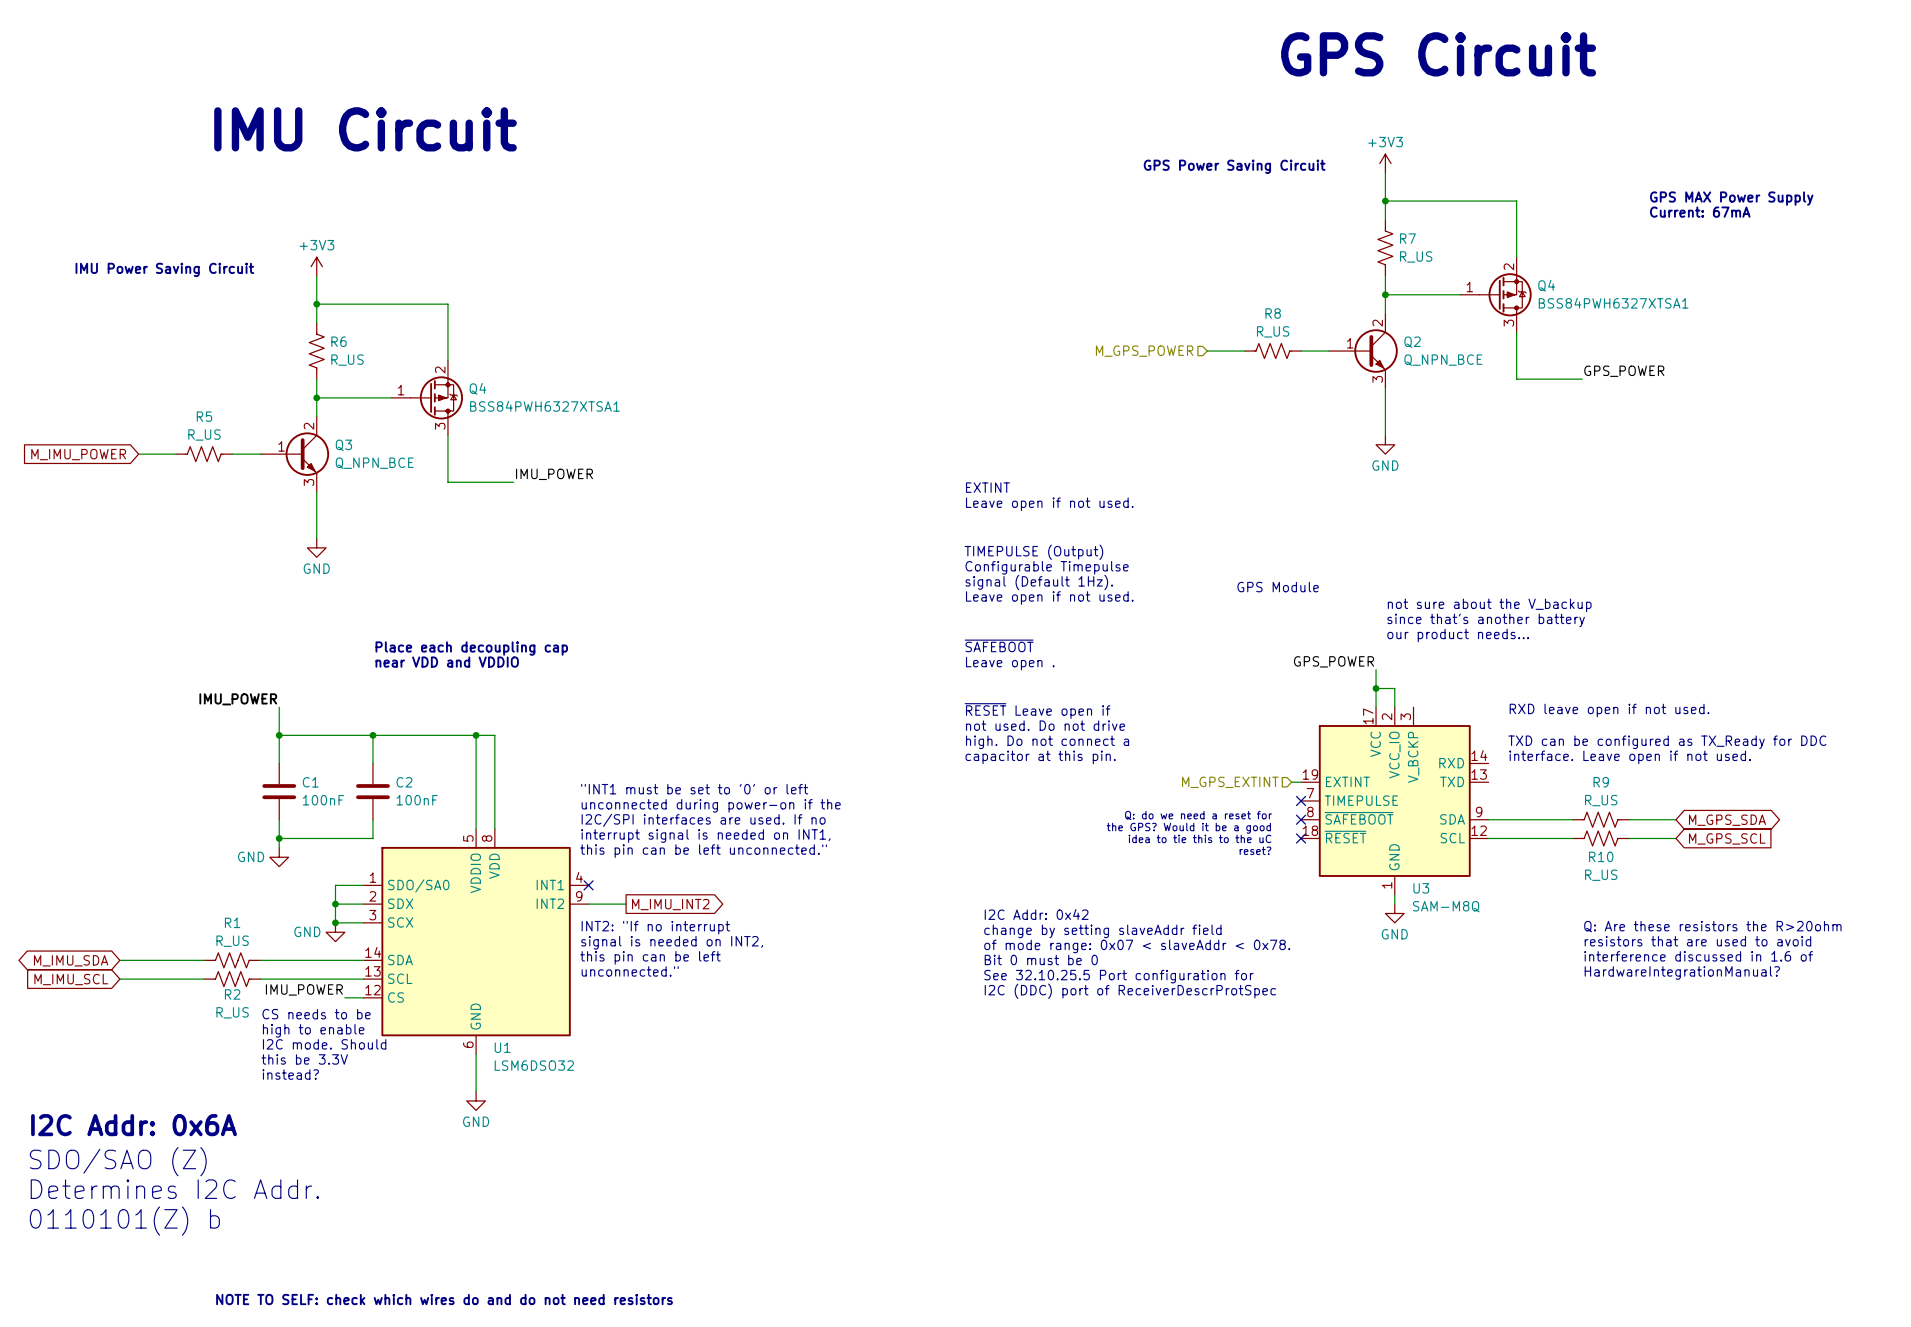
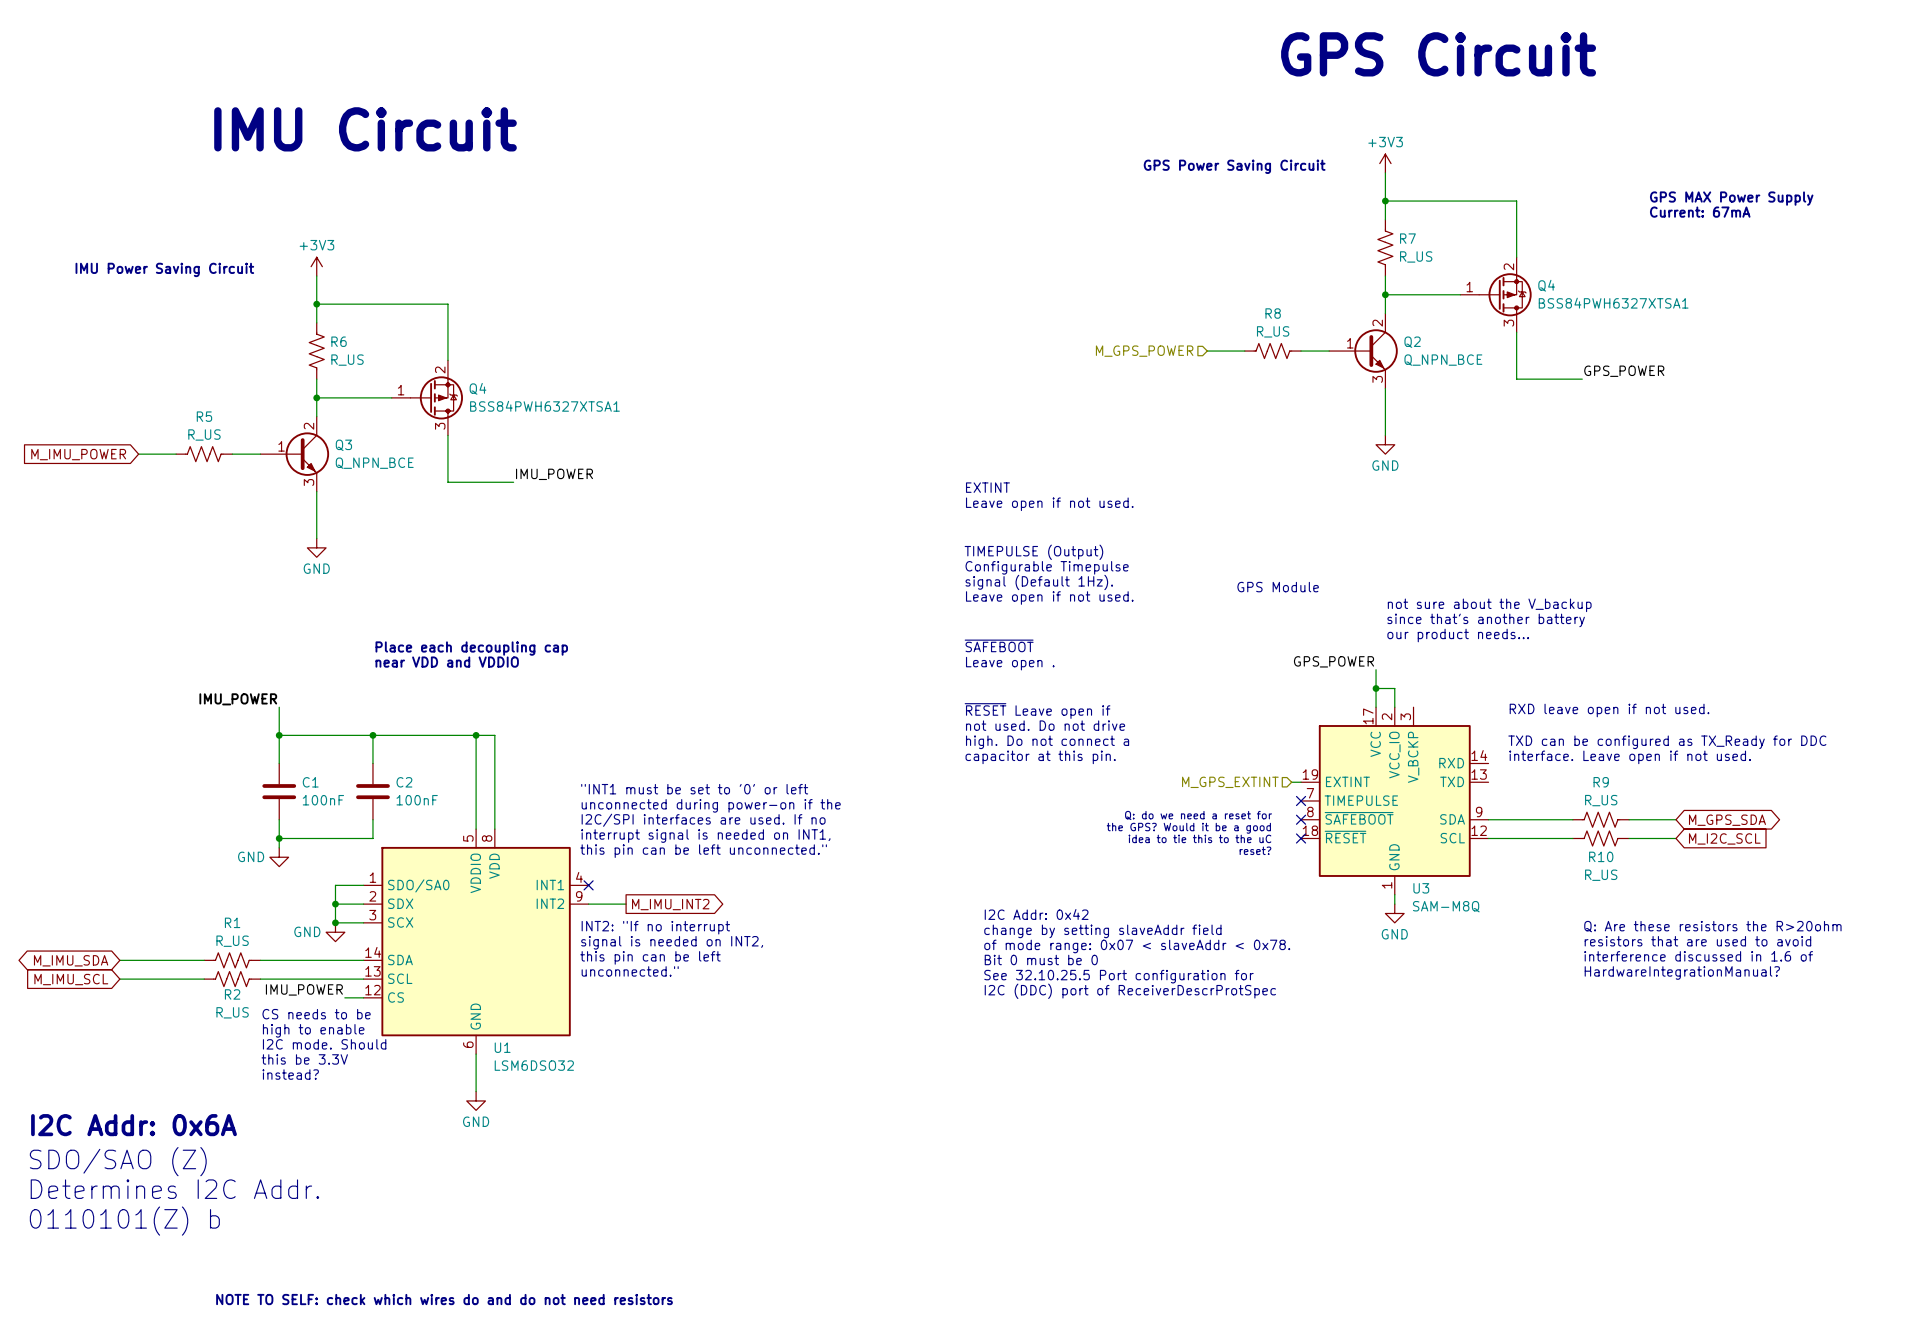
global label: M_GPS_SCL (1727, 838) -> M_I2C_SCL (1724, 838)

